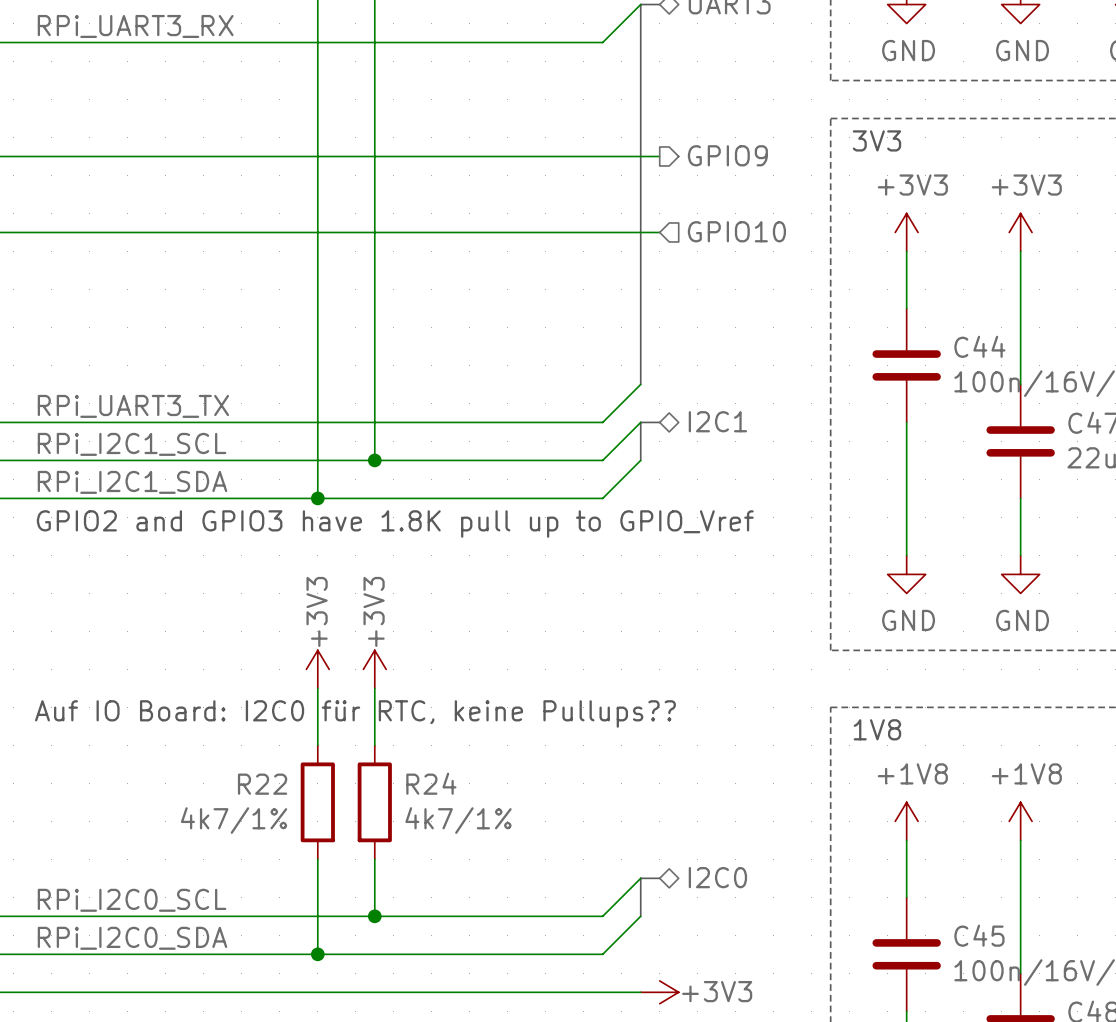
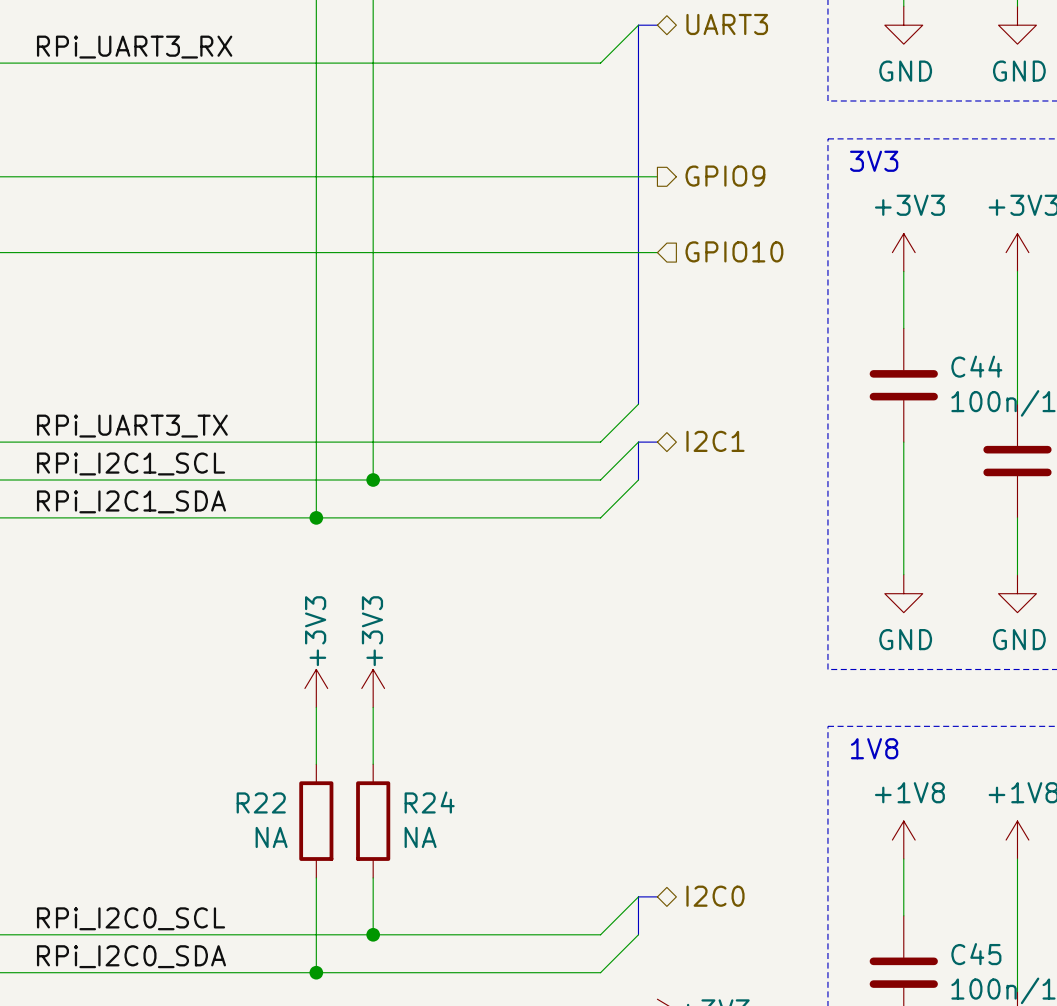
text: GPIO2 and GPIO3 have 1.8K pull up to GPIO_Vref (395, 524) -> none
text: Auf IO Board: I2C0 für RTC, keine Pullups?? (355, 713) -> none
R22 value: 4k7/1% (234, 820) -> NA (271, 837)
R24 value: 4k7/1% (458, 820) -> NA (420, 837)

